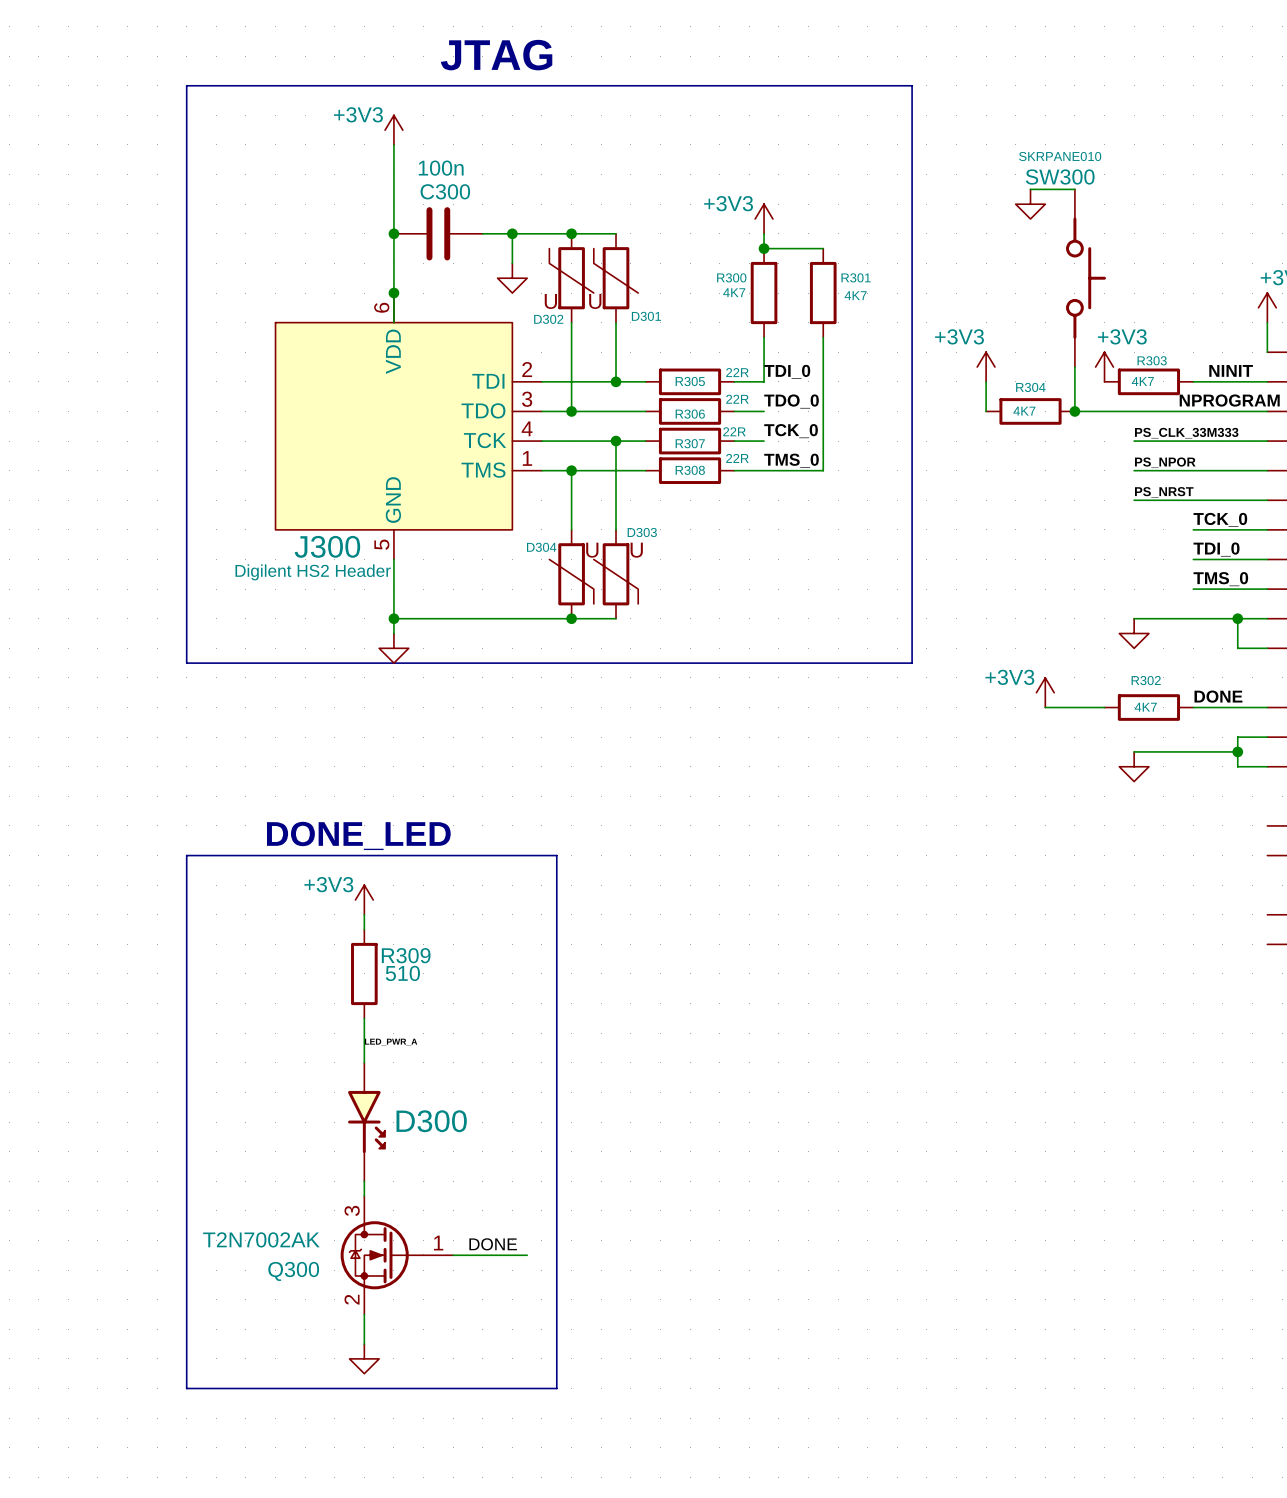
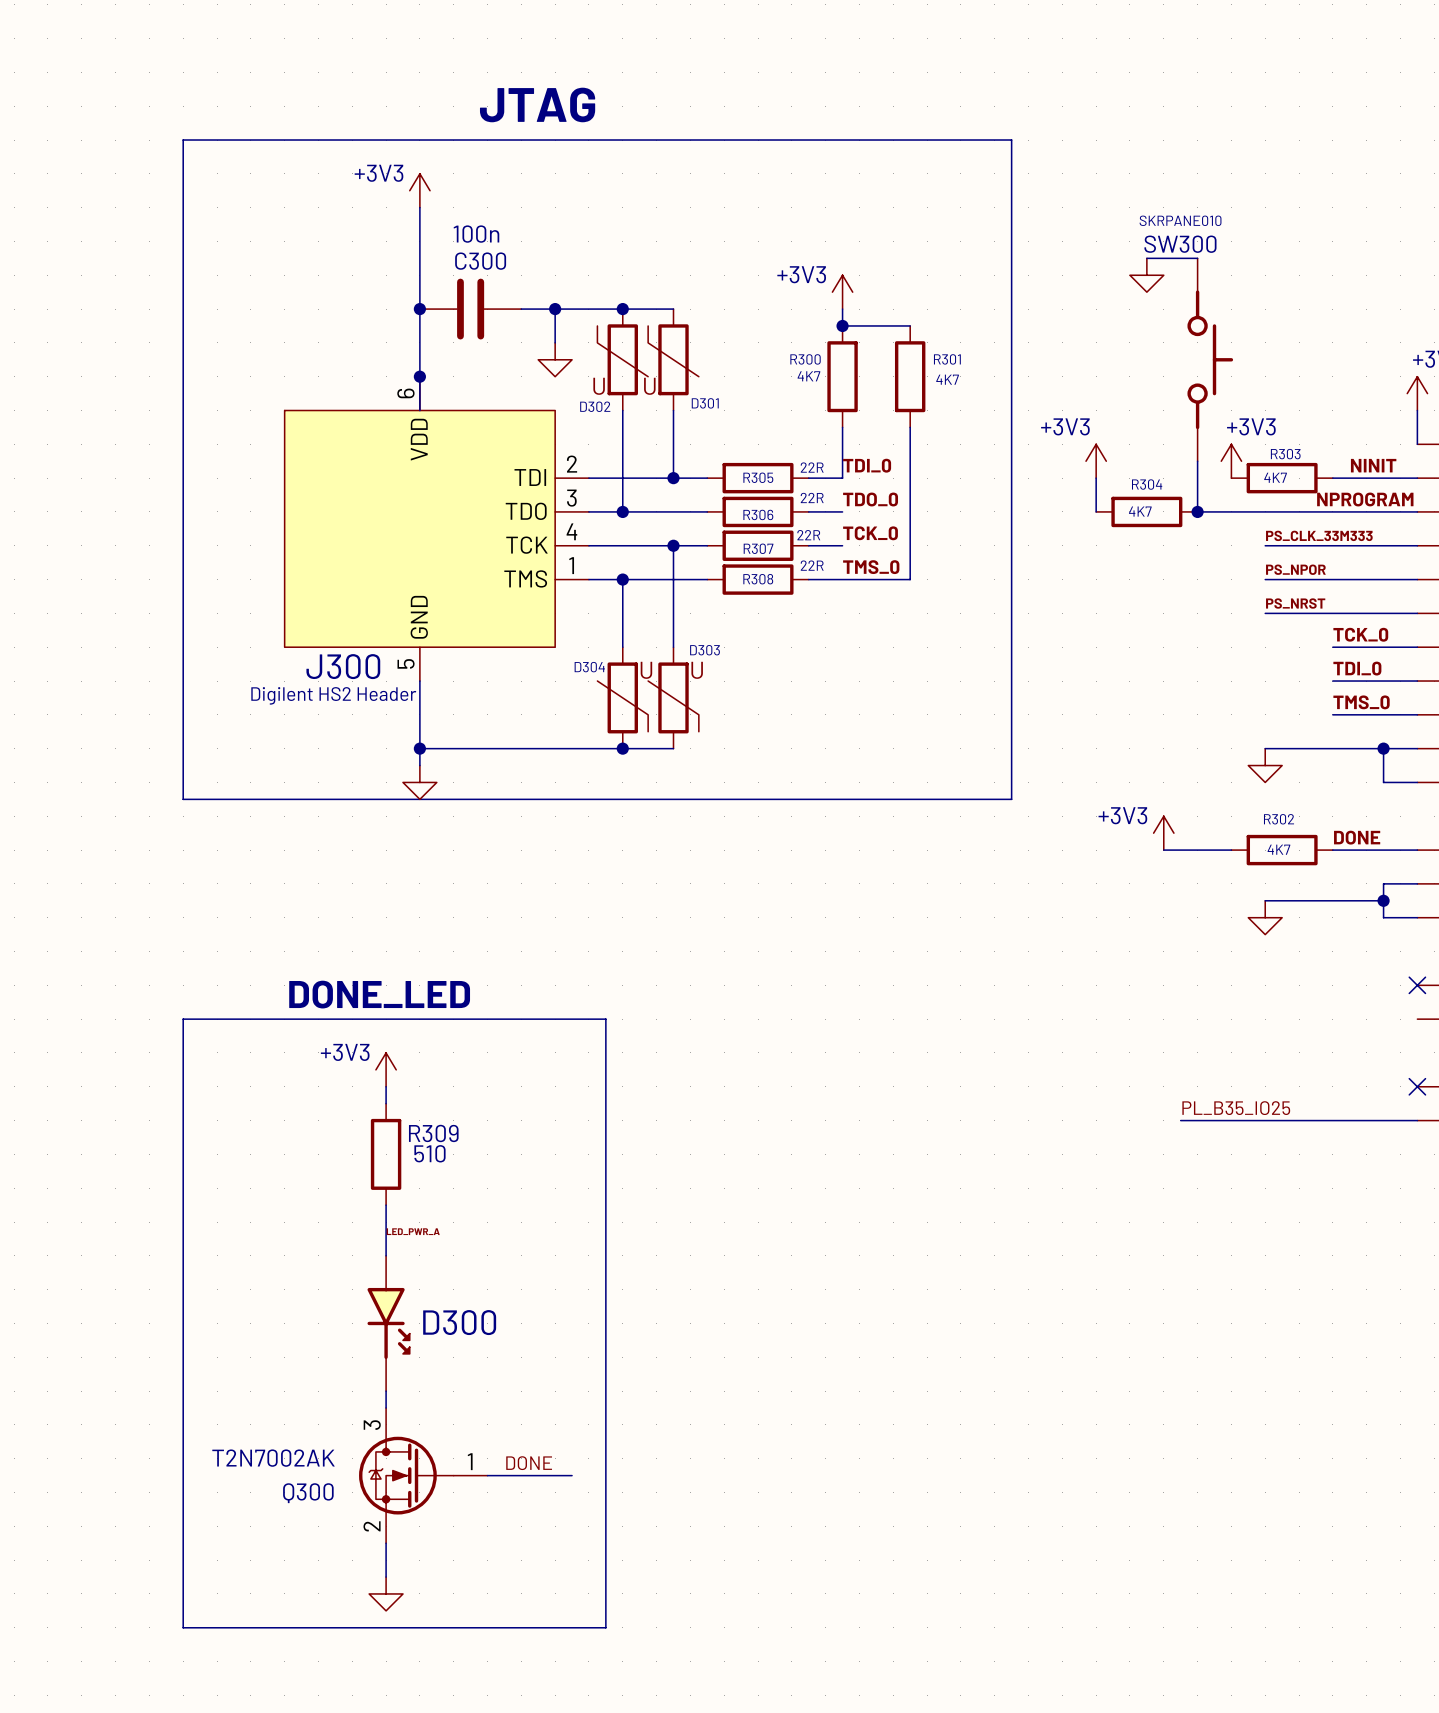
no-connect mark: none -> (1417, 985)
no-connect mark: none -> (1417, 1086)
label: none -> PL_B35_IO25 (1236, 1108)
wire: none -> (1180, 1120) (1417, 1120)

